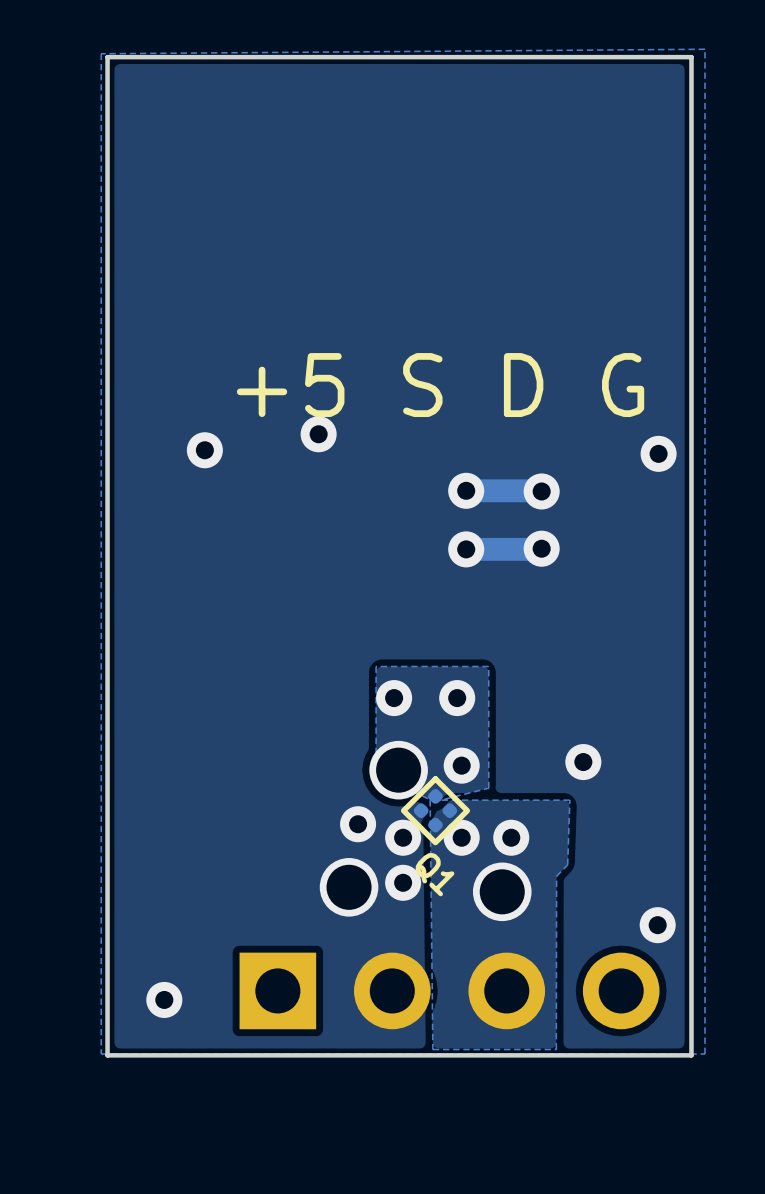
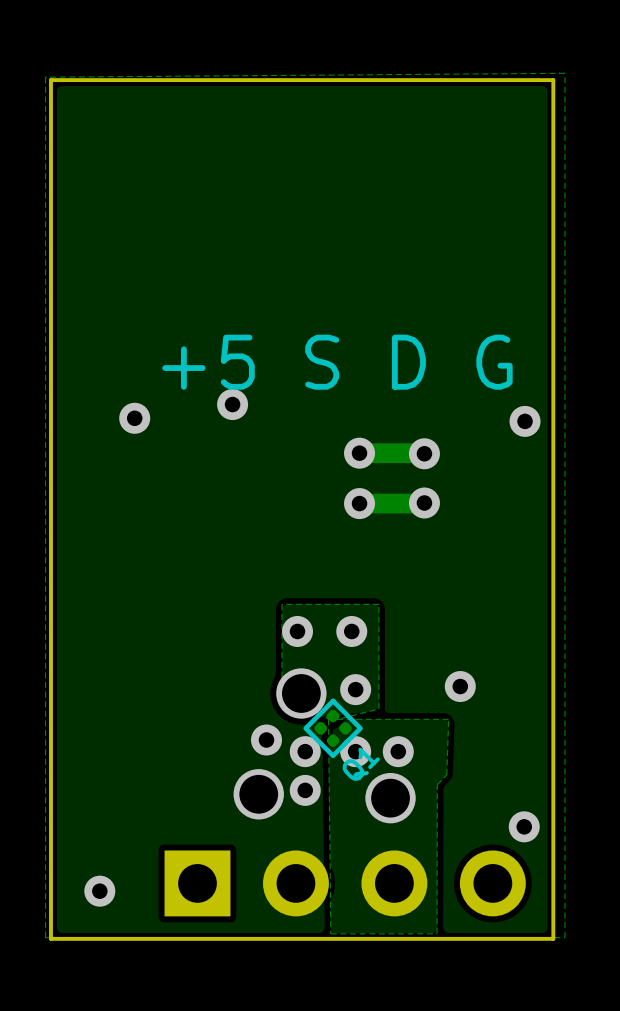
Q1 name rotation: 0° (435, 874) -> 90° counterclockwise (361, 764)

